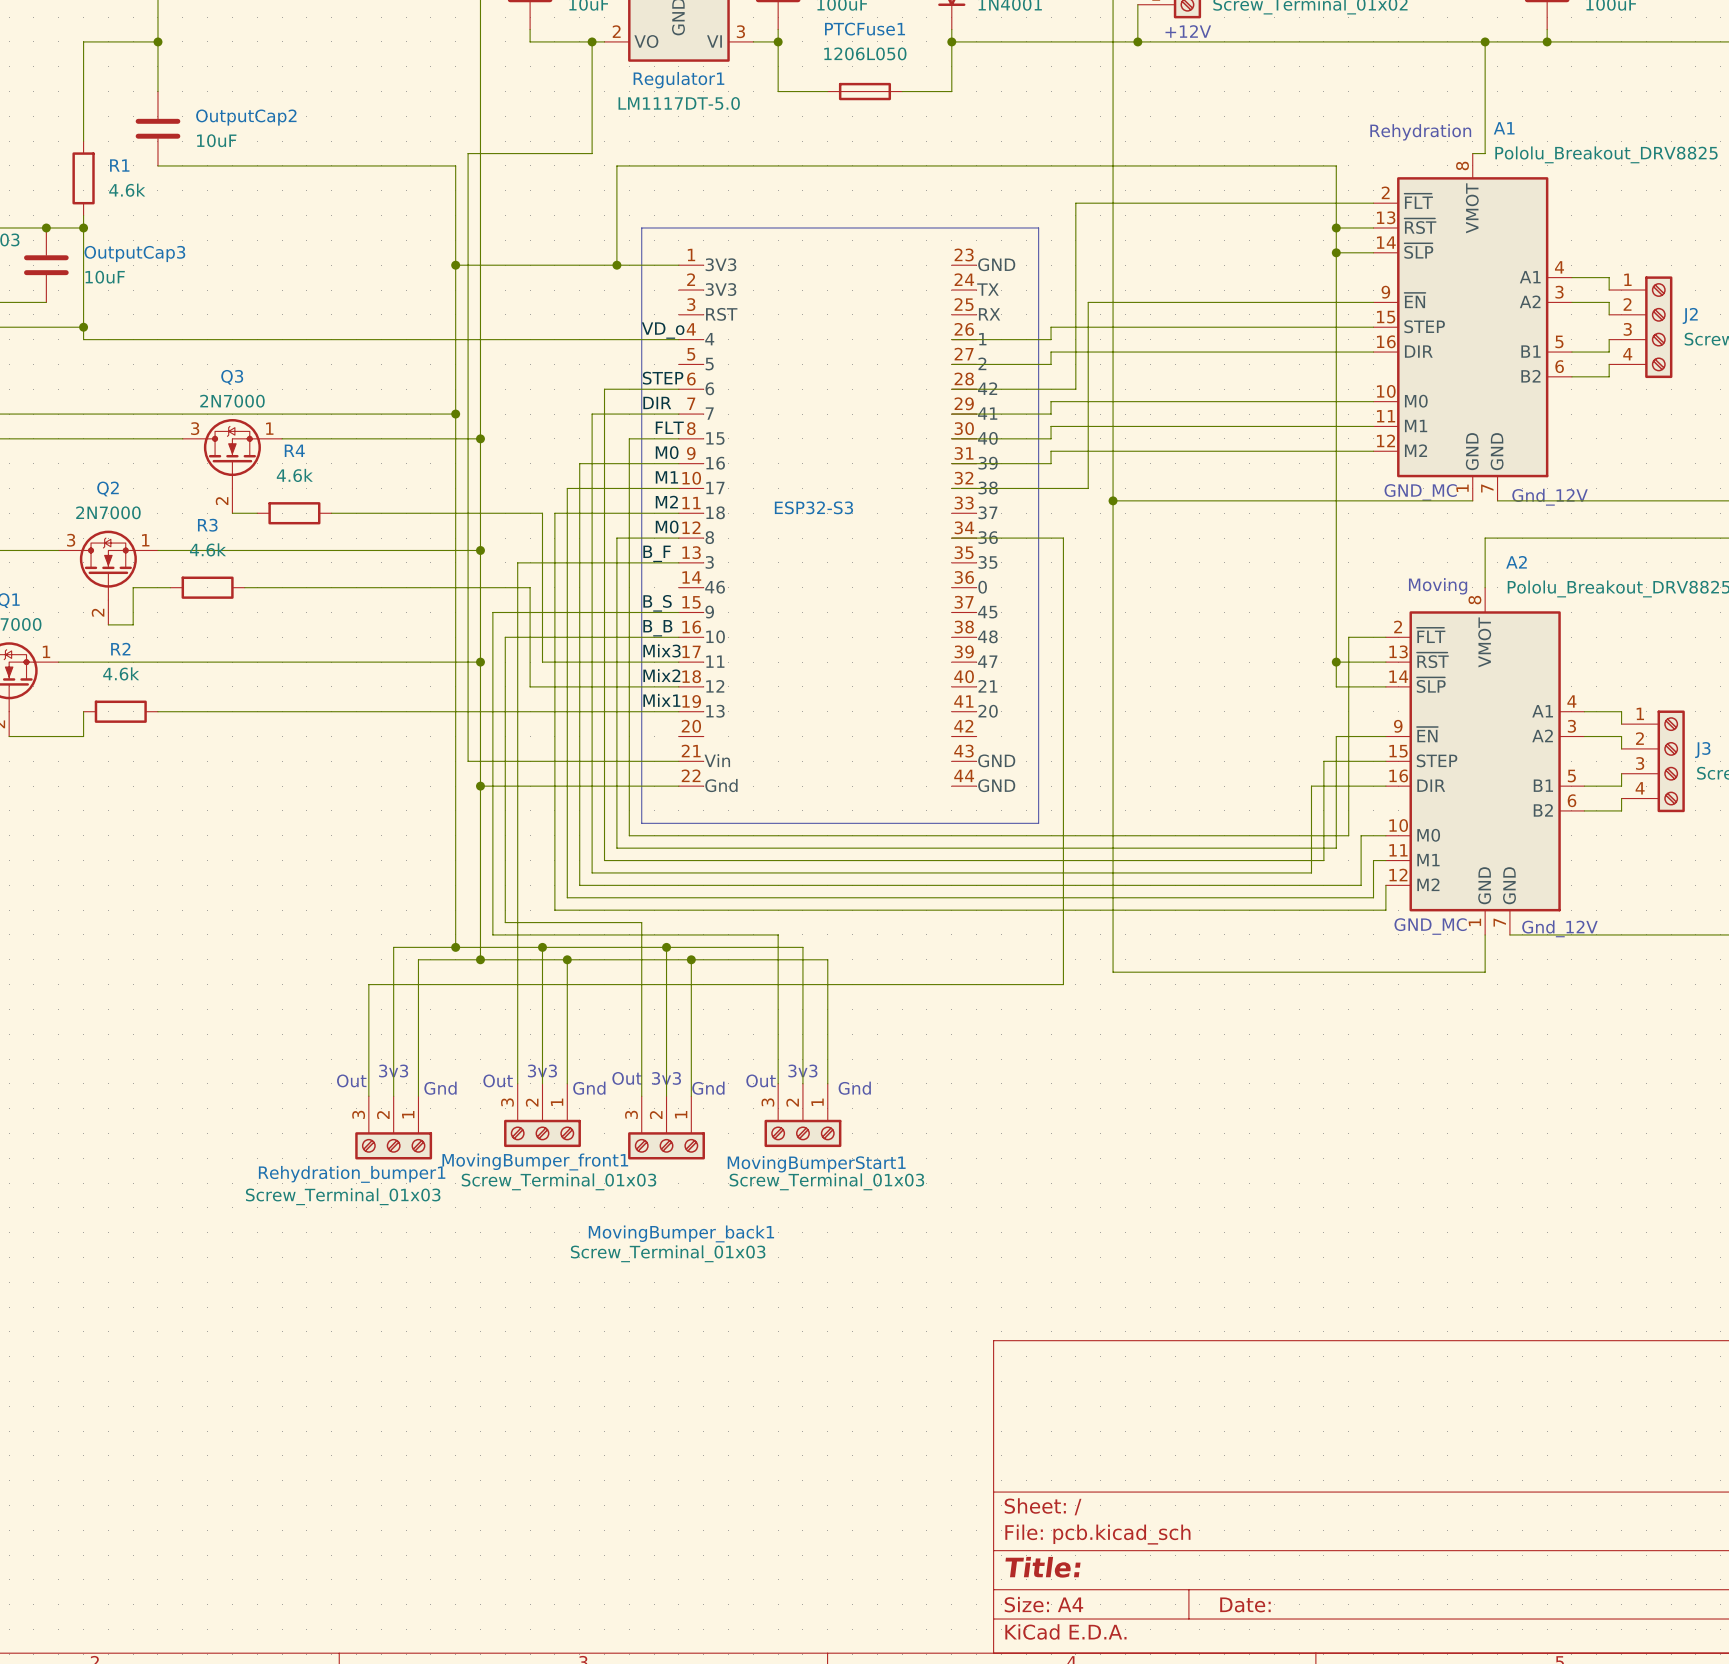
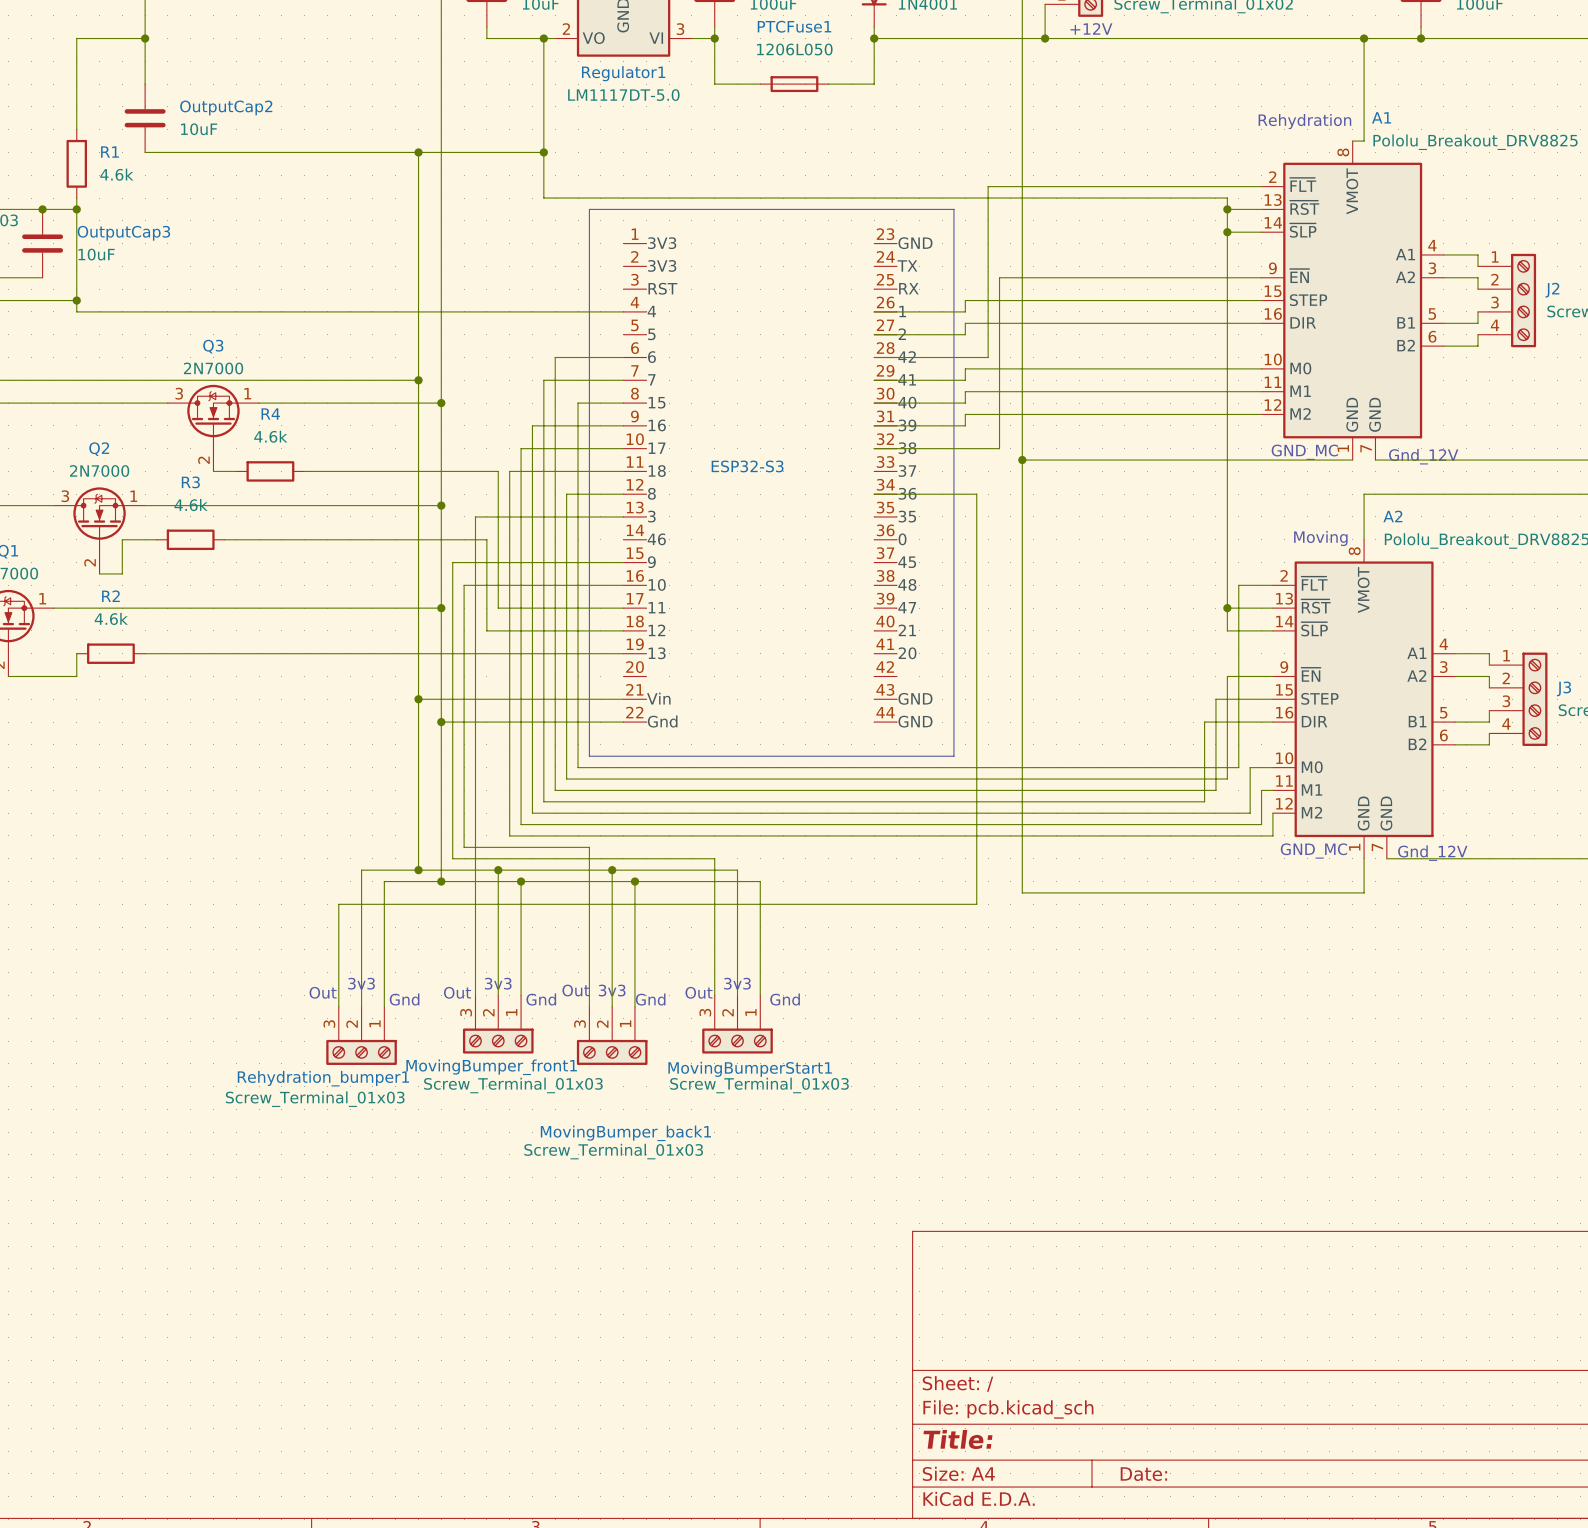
wire: (592, 153) (468, 153) (468, 761) -> (418, 699) (429, 699)
wire: none -> (418, 152) (543, 152)
junction: none -> (418, 152)
junction: none -> (543, 152)
wire: (1336, 215) (1336, 165) (616, 165) (616, 265) -> (1227, 198) (543, 198) (543, 141)
wire: (455, 265) (678, 265) -> none
junction: (455, 265) -> none
junction: (616, 265) -> none
label: VD_o (663, 330) -> none
label: STEP (663, 378) -> none
label: DIR (657, 402) -> none
label: FLT (669, 427) -> none
label: M0 (667, 452) -> none
label: M1 (666, 477) -> none
label: M2 (666, 502) -> none
label: M0 (667, 527) -> none
label: B_F (657, 553) -> none
label: B_S (657, 603) -> none
label: B_B (657, 628) -> none
label: Mix3 (662, 650) -> none
label: Mix2 (661, 675) -> none
label: Mix1 (661, 700) -> none
junction: none -> (418, 699)

